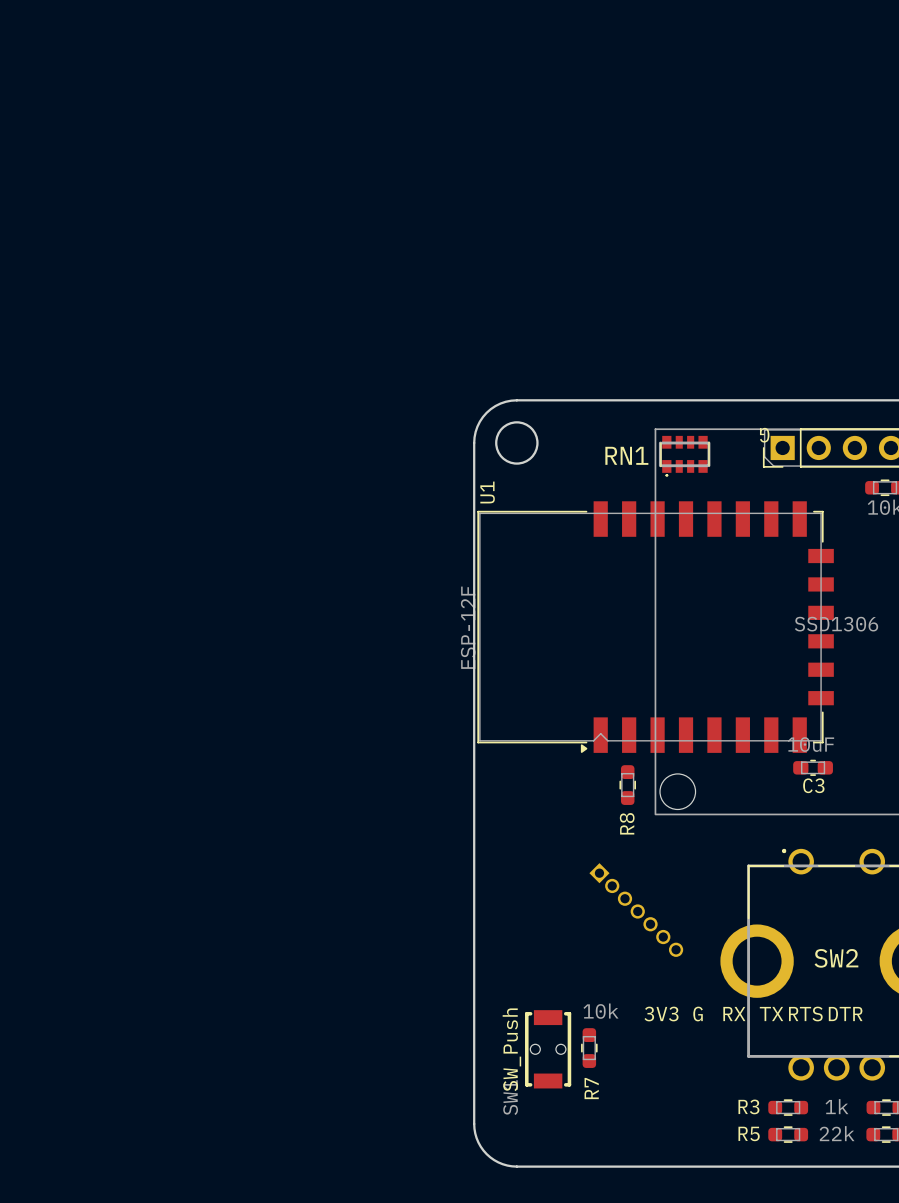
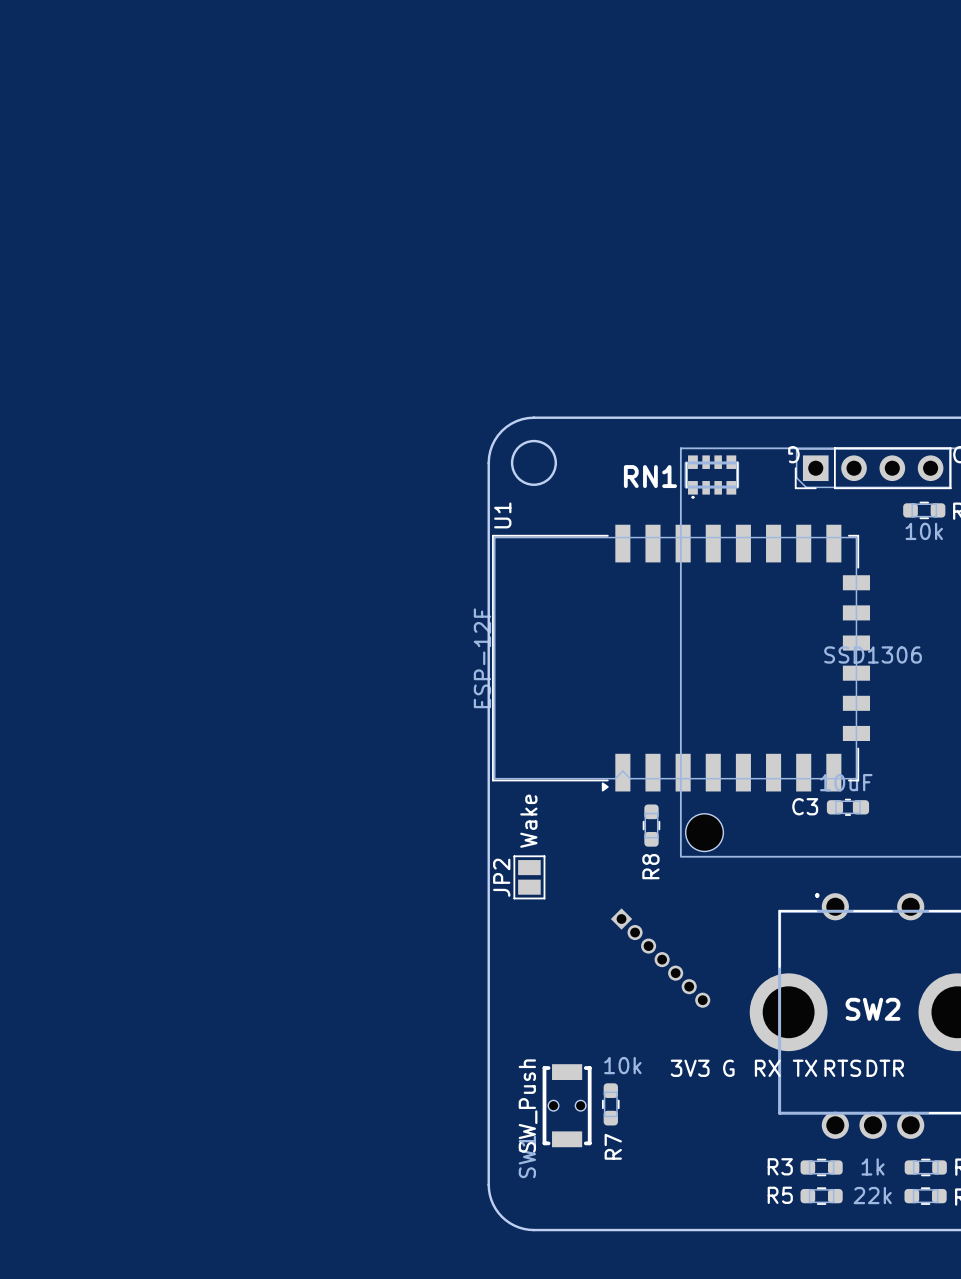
C3 name position: C3 (813, 785) -> C3 (805, 806)
JP2: none -> Wake (529, 877)

